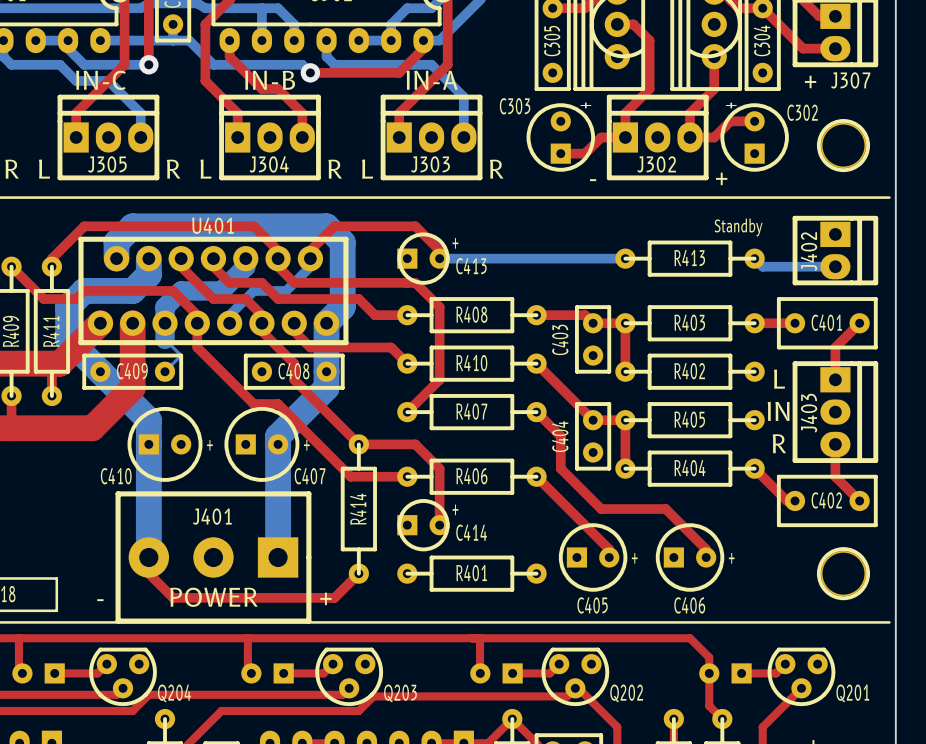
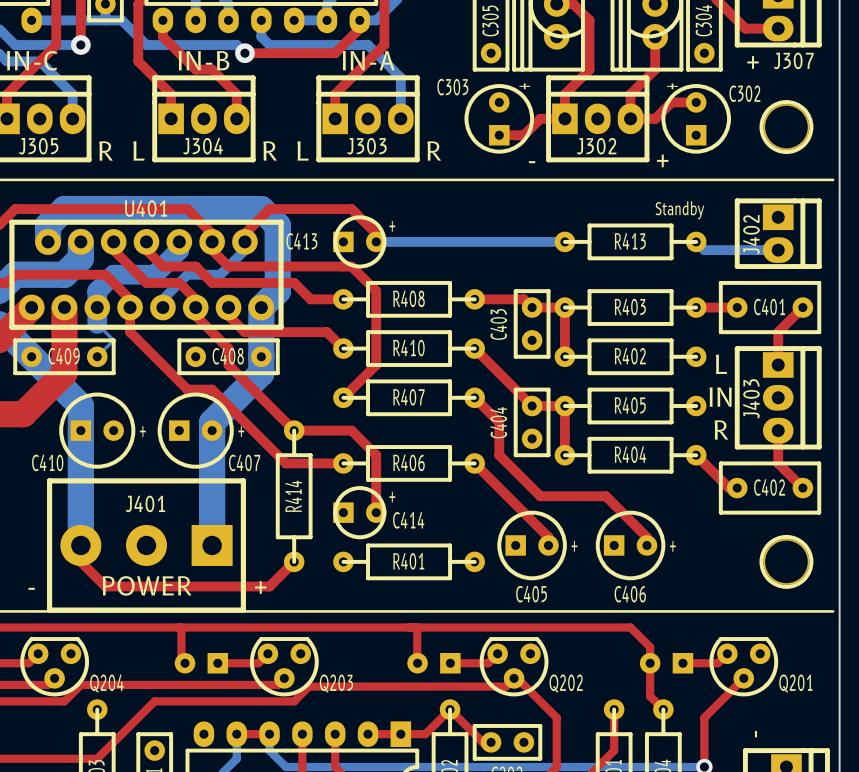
C413 name position: C413 (471, 266) -> C413 (301, 241)

